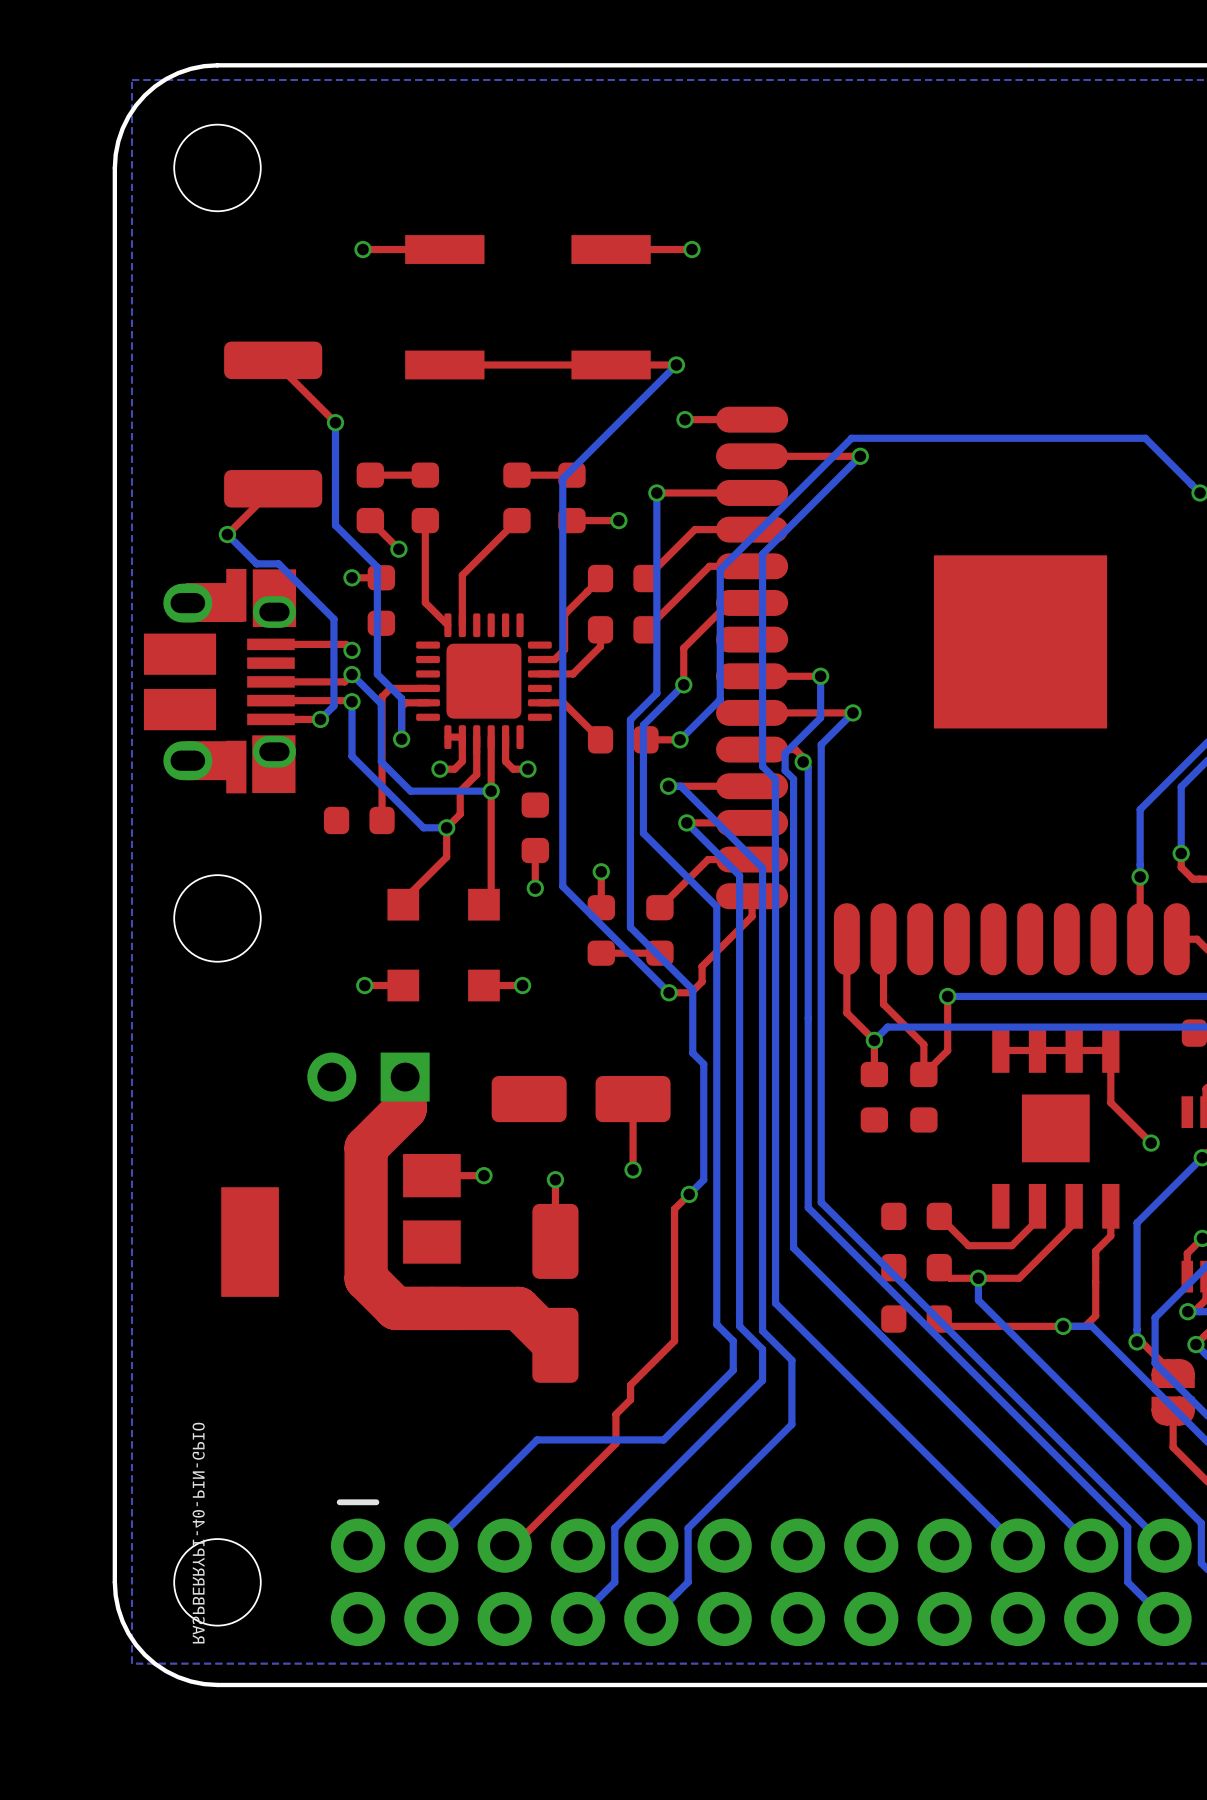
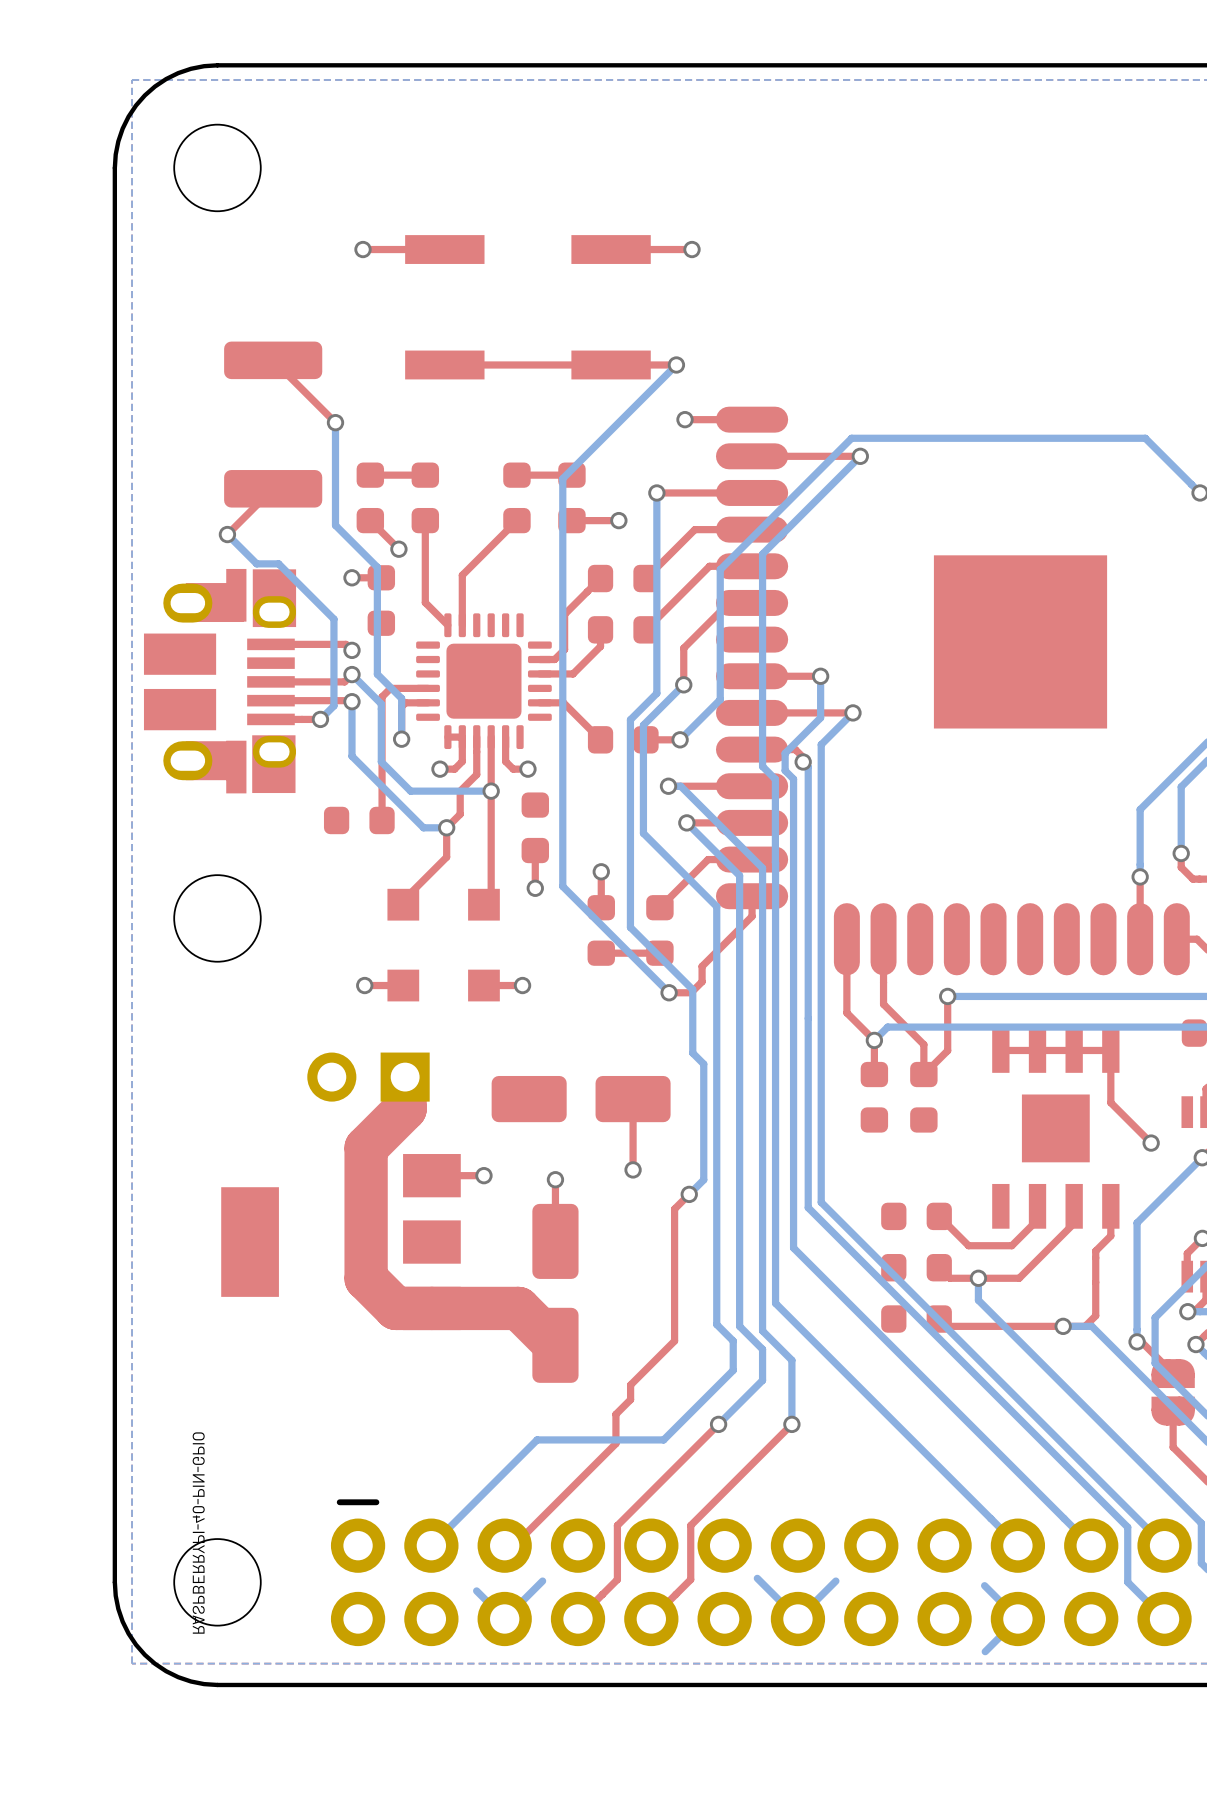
top track: none -> (718, 1424) (617, 1525) (617, 1579) (578, 1618)
bottom track: (718, 1424) (614, 1528) (614, 1582) (578, 1618) -> none
via: none -> (718, 1424)
top track: none -> (791, 1424) (690, 1525) (690, 1579) (651, 1618)
bottom track: (791, 1424) (688, 1528) (688, 1582) (651, 1618) -> none
via: none -> (791, 1424)
bottom track: none -> (757, 1578) (797, 1618) (835, 1581)
bottom track: none -> (542, 1581) (504, 1618) (476, 1590)
bottom track: none -> (984, 1585) (1017, 1618) (985, 1651)

